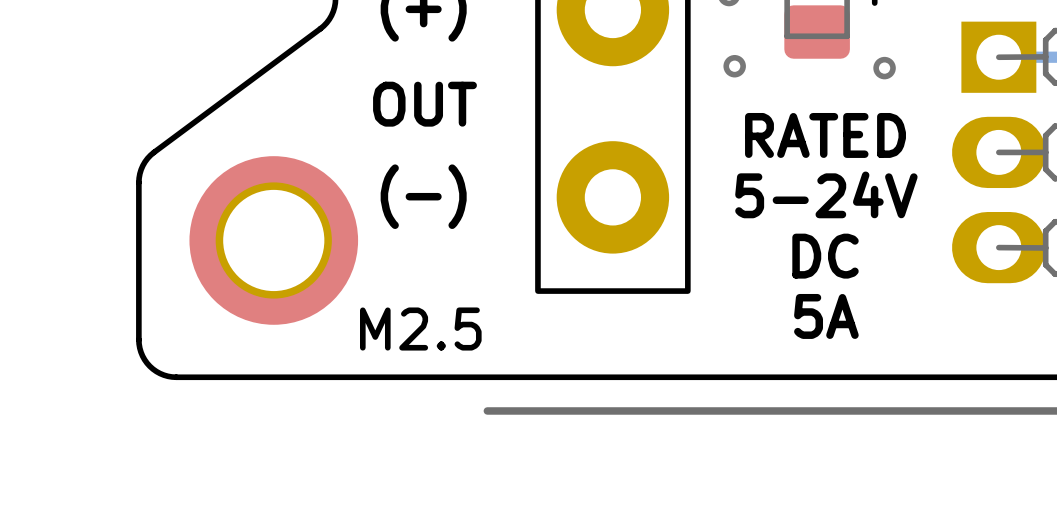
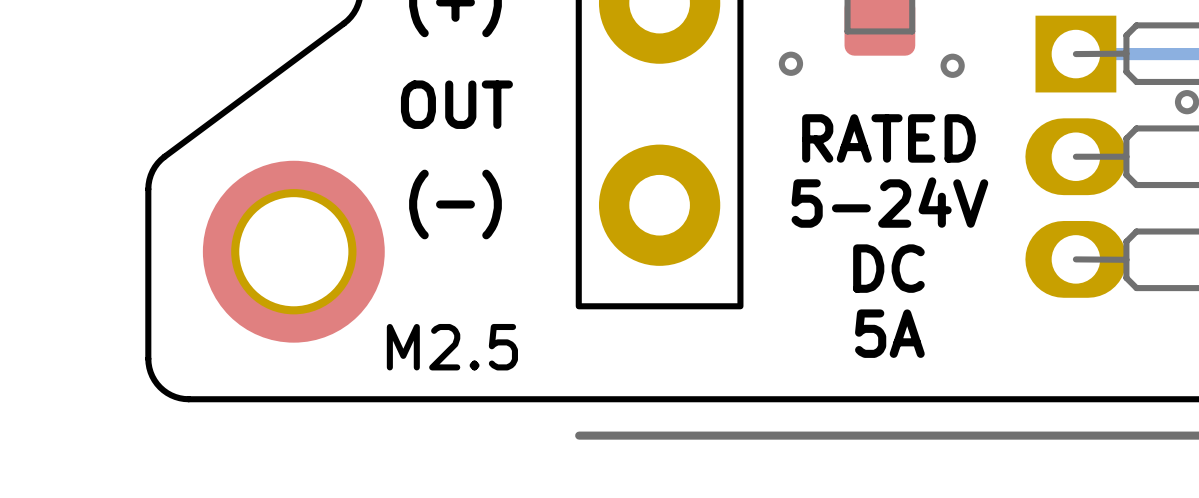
line: (487, 410) (538, 410) -> none

